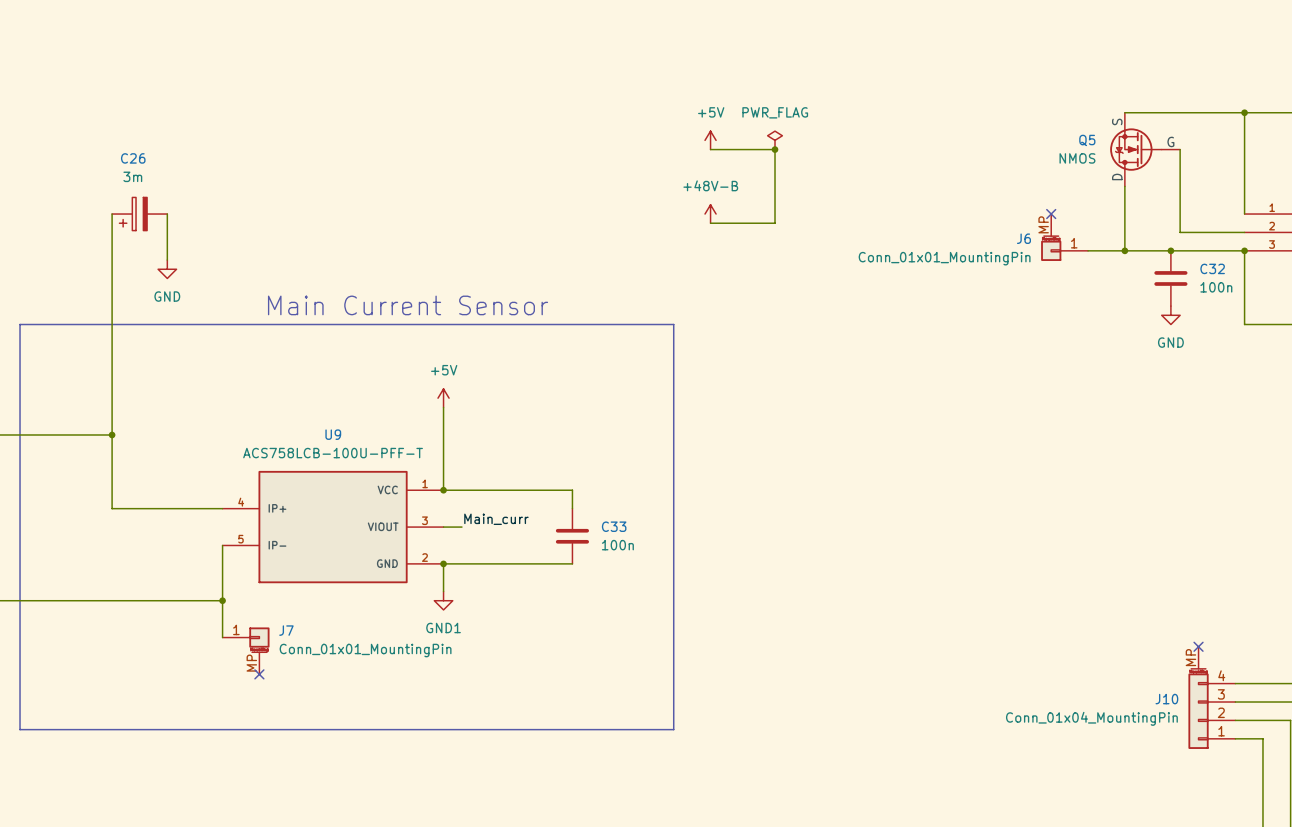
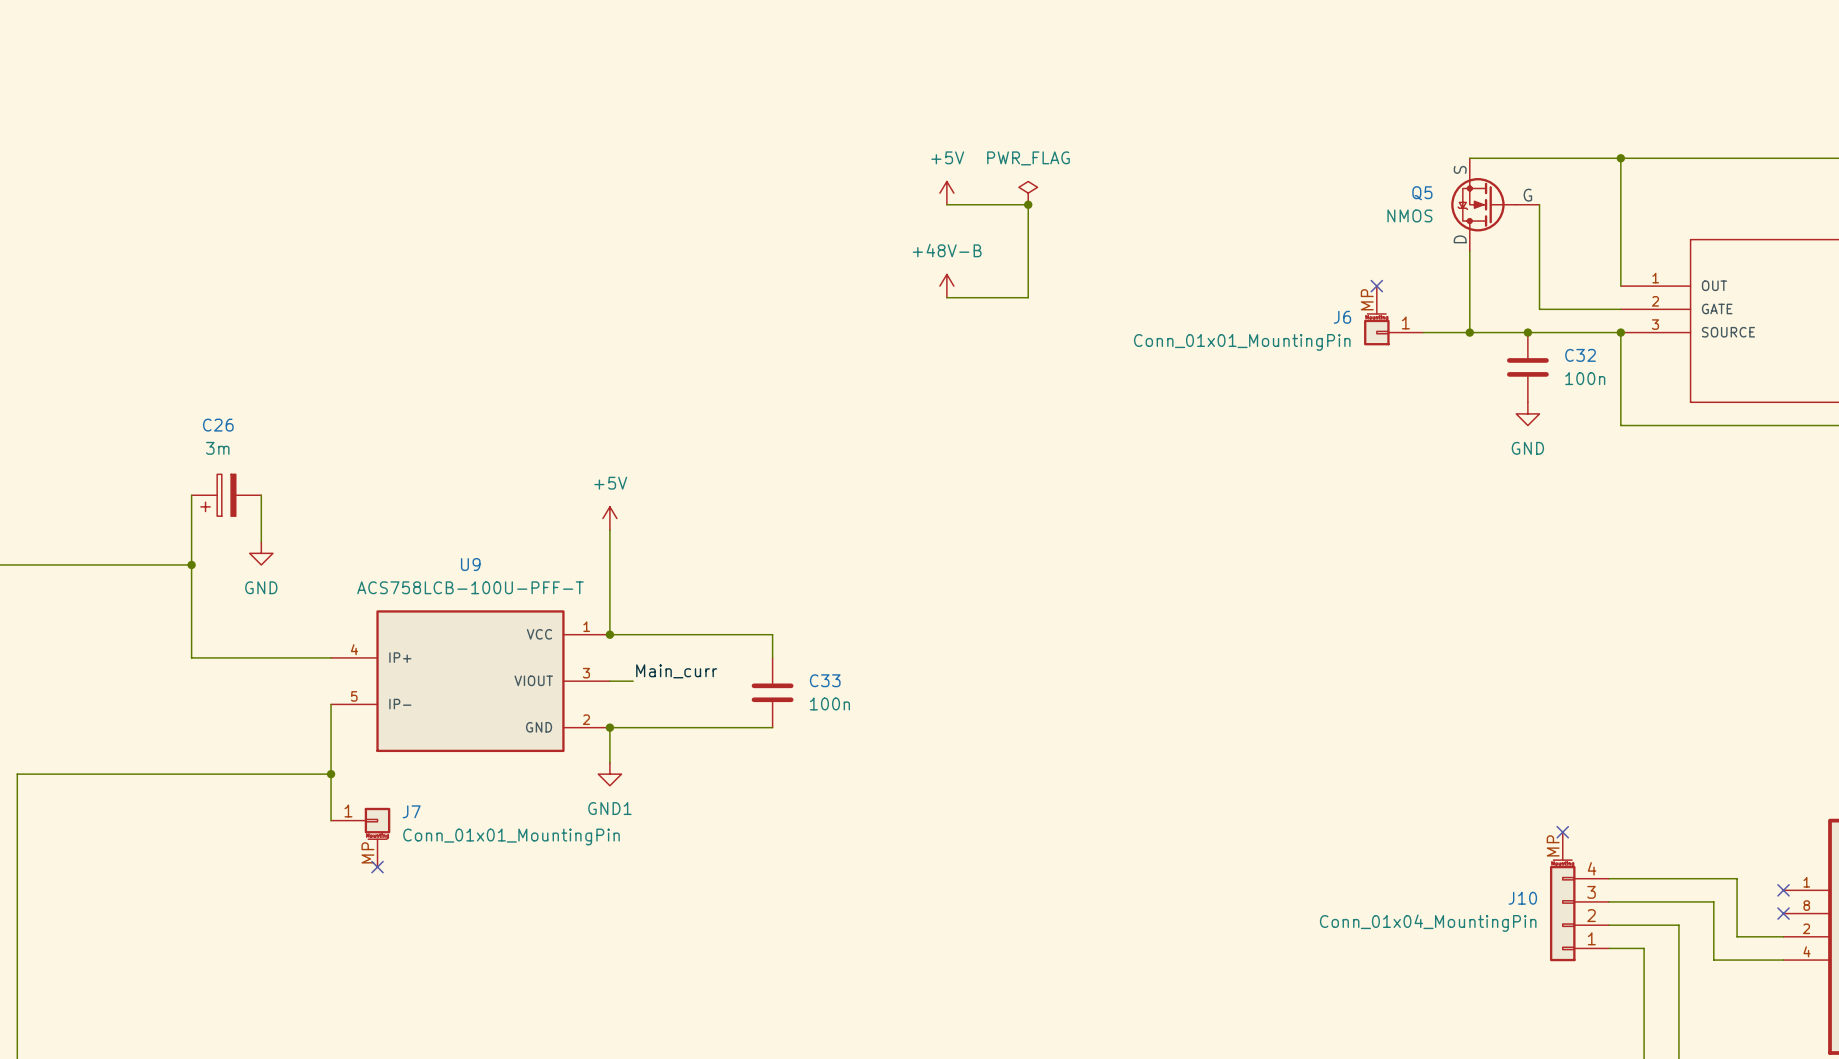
wire: (112, 214) (112, 379) -> none
C26 position: (139, 214) -> (226, 495)
wire: (167, 214) (167, 260) -> none
power symbol position: GND (167, 269) -> GND (261, 553)
text: Main Current Sensor (408, 305) -> none
line: (20, 324) (673, 324) (673, 729) (20, 729) (20, 324) -> none
wire: none -> (261, 495) (261, 541)

